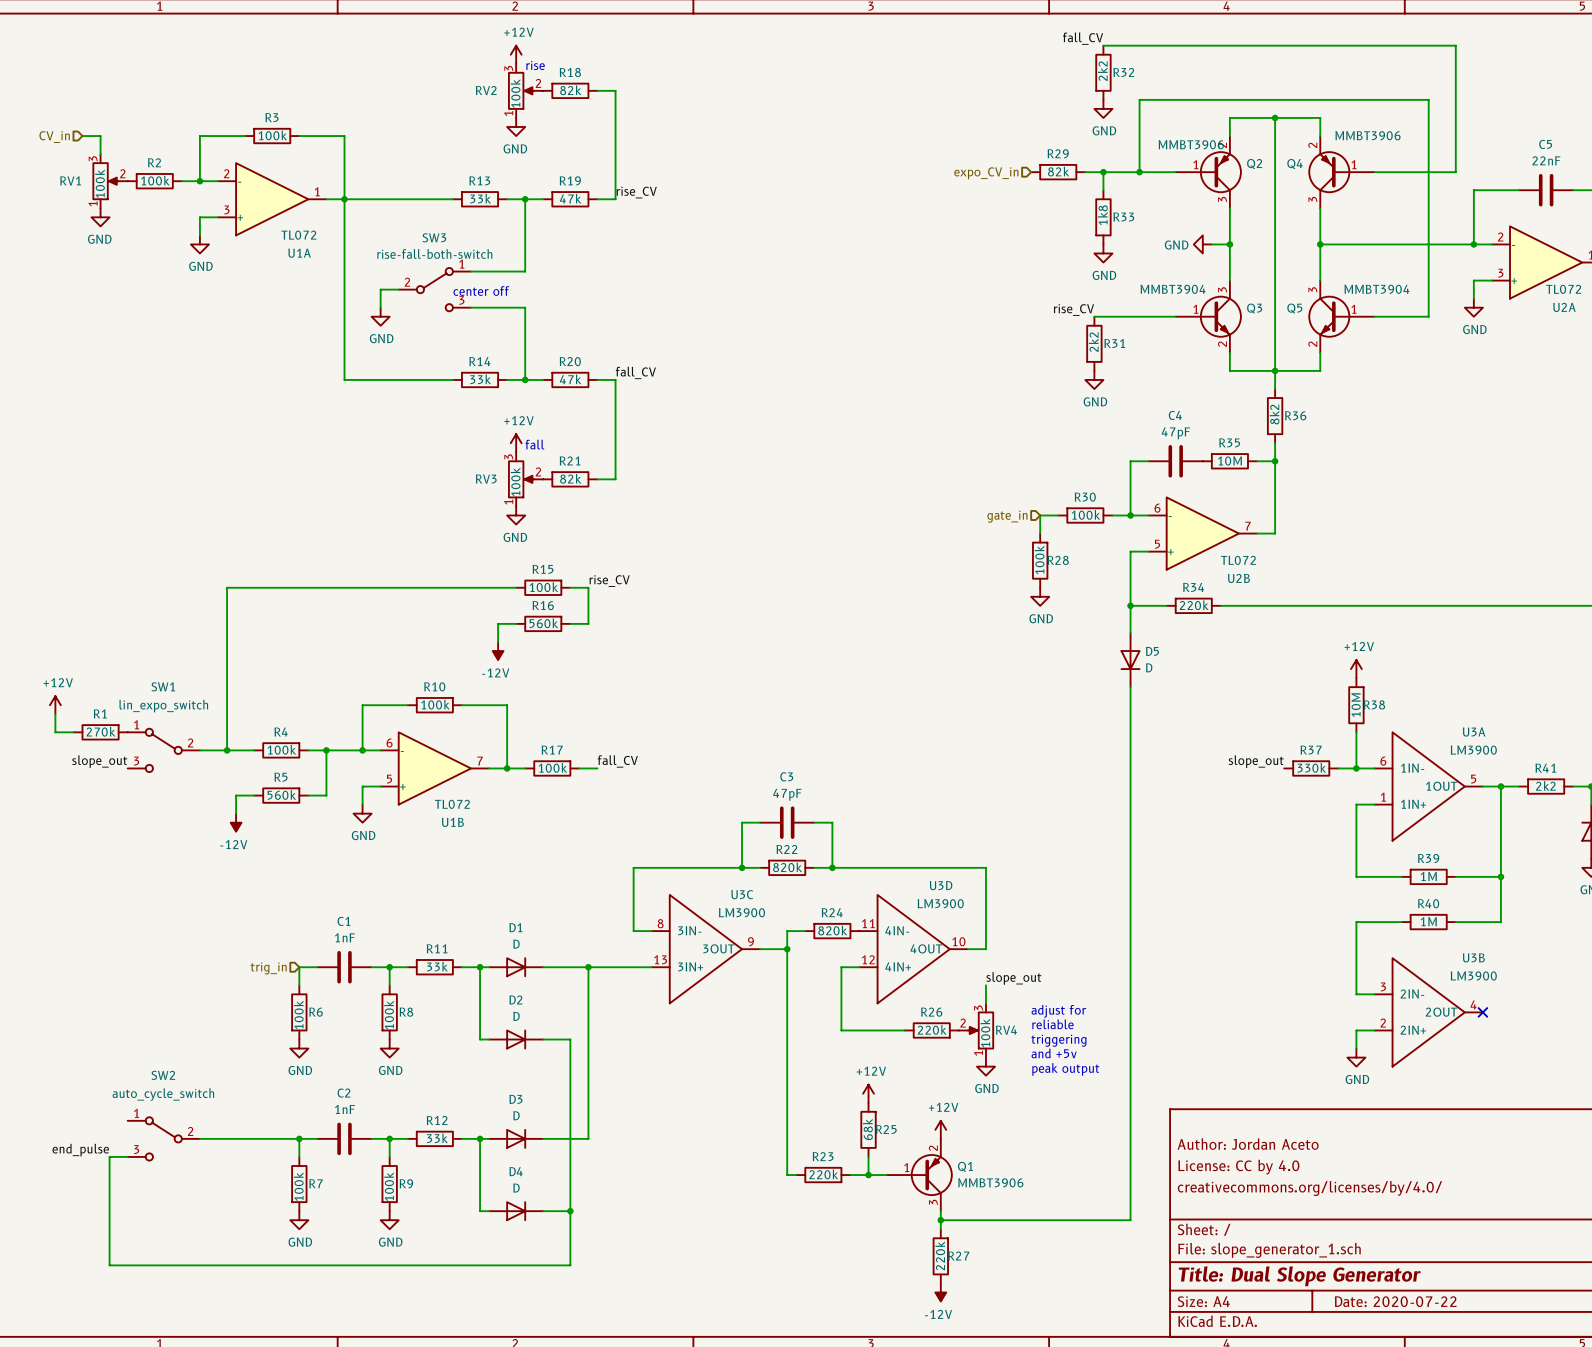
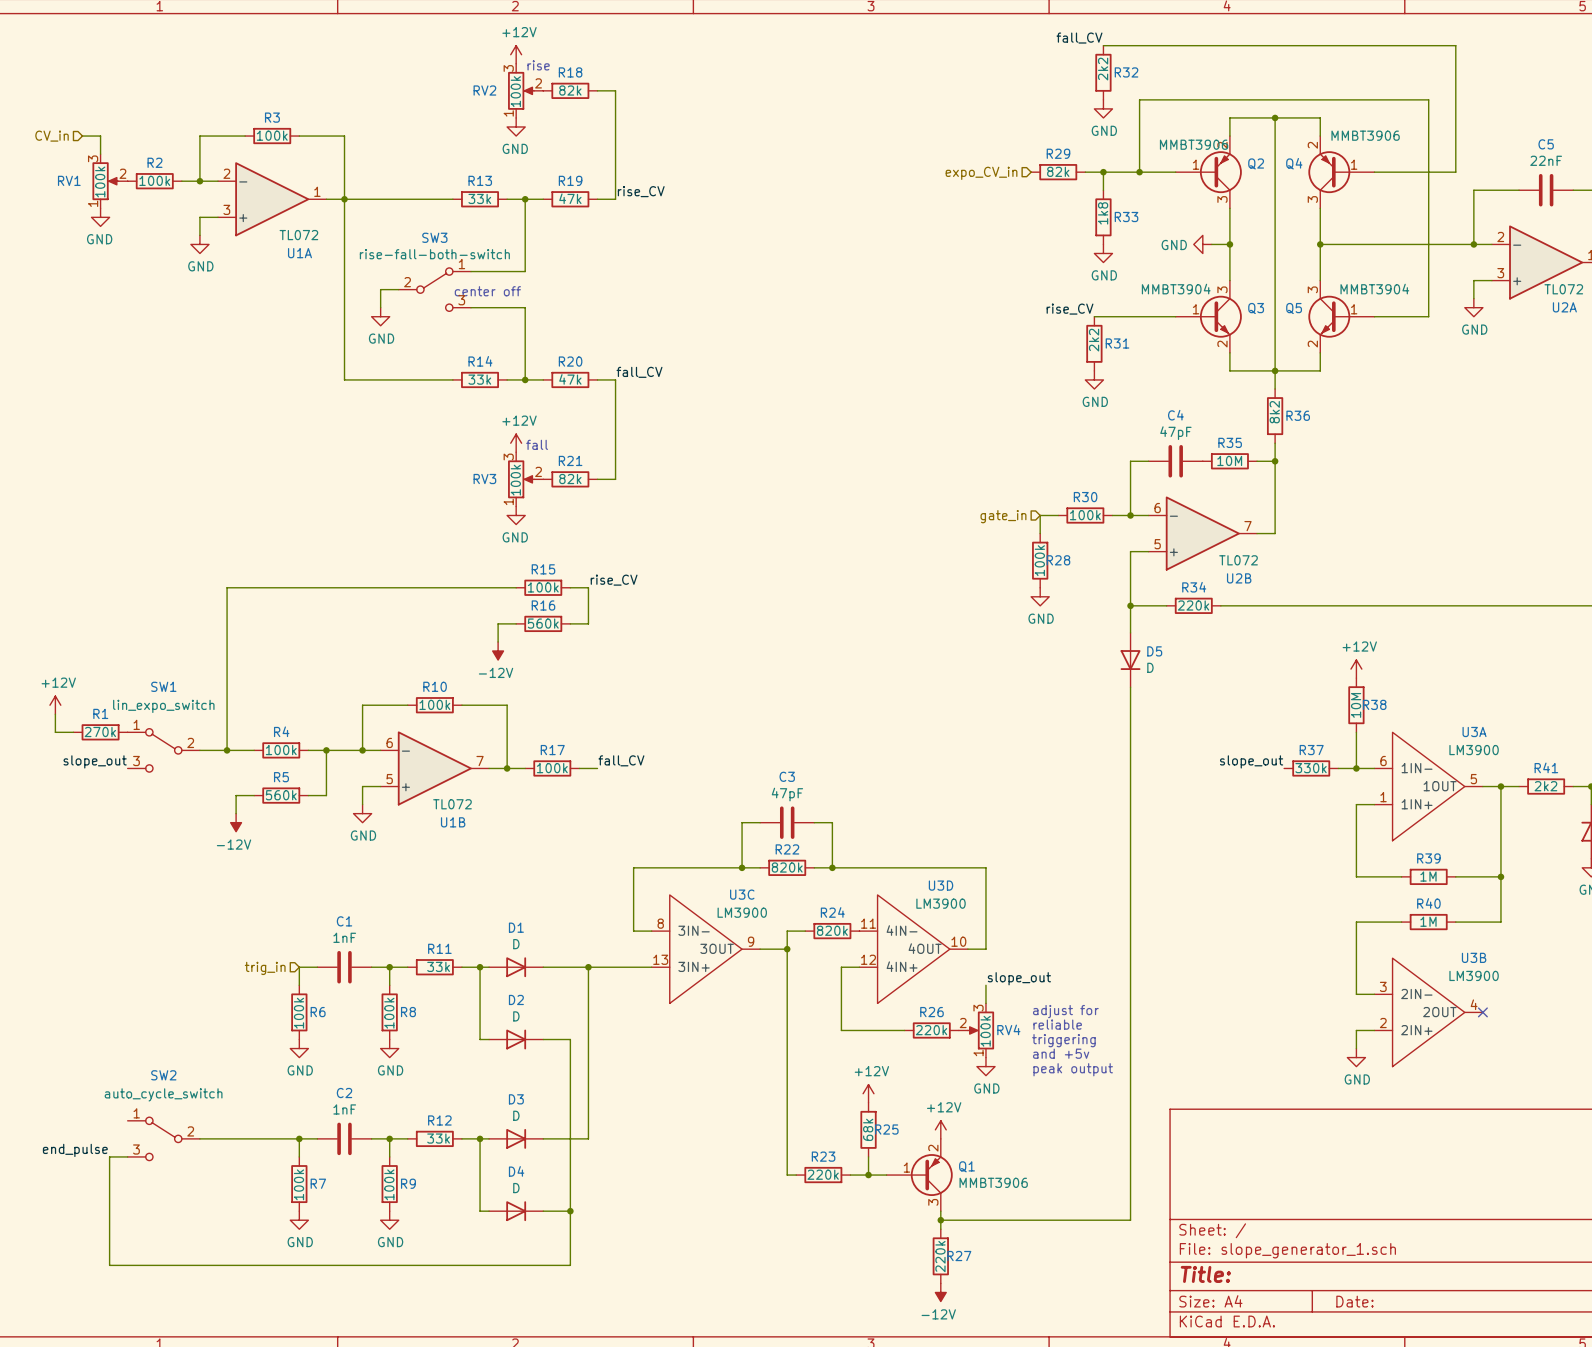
title block: Author: Jordan Aceto (1248, 1144) -> none
title block: License: CC by 4.0 (1238, 1167) -> none
title block: creativecommons.org/licenses/by/4.0/ (1309, 1188) -> none
title block: Title: Dual Slope Generator (1299, 1276) -> Title: (1205, 1274)
title block: Date: 2020-07-22 (1395, 1301) -> Date: (1354, 1301)

